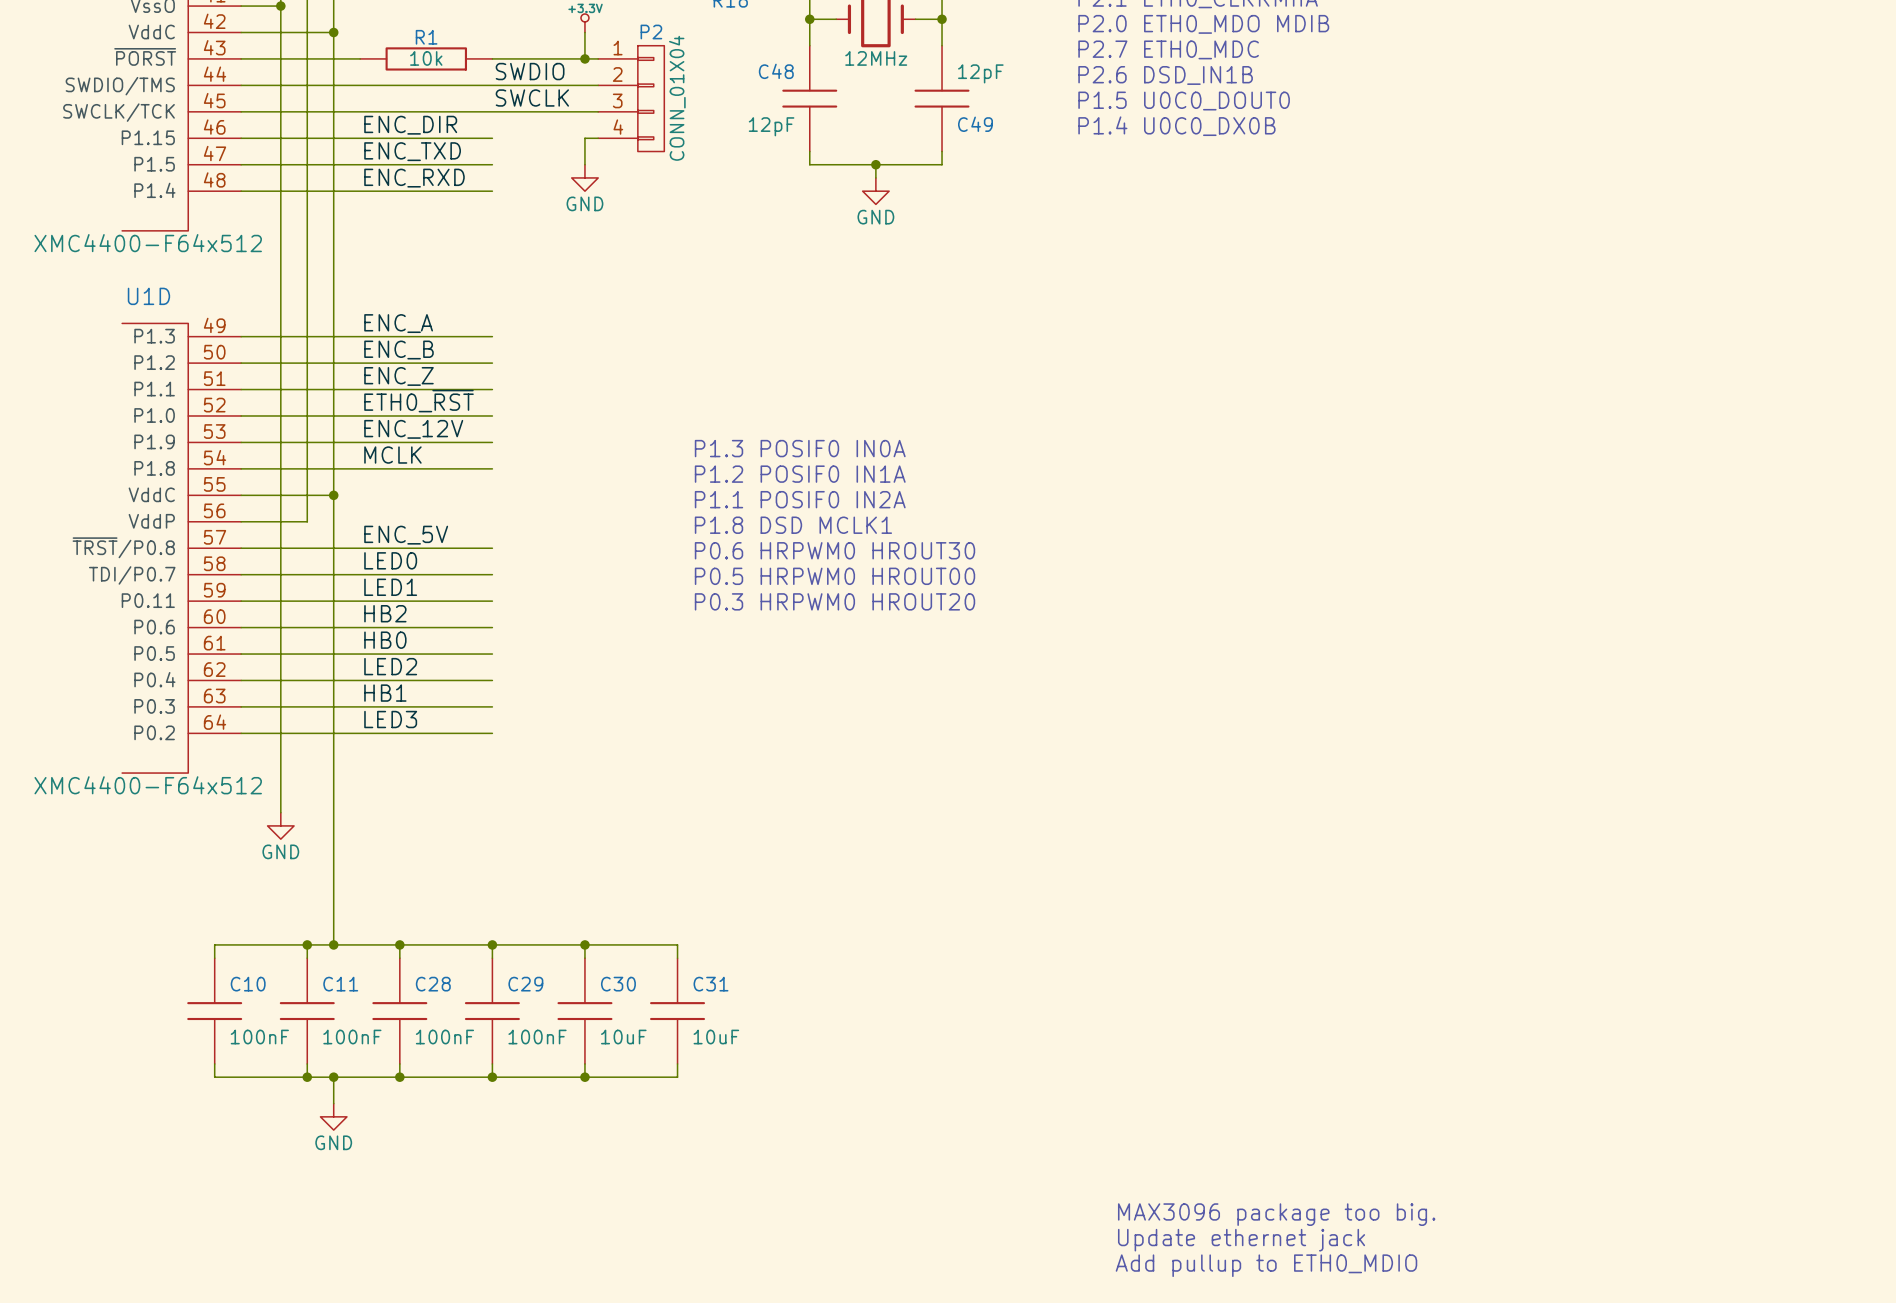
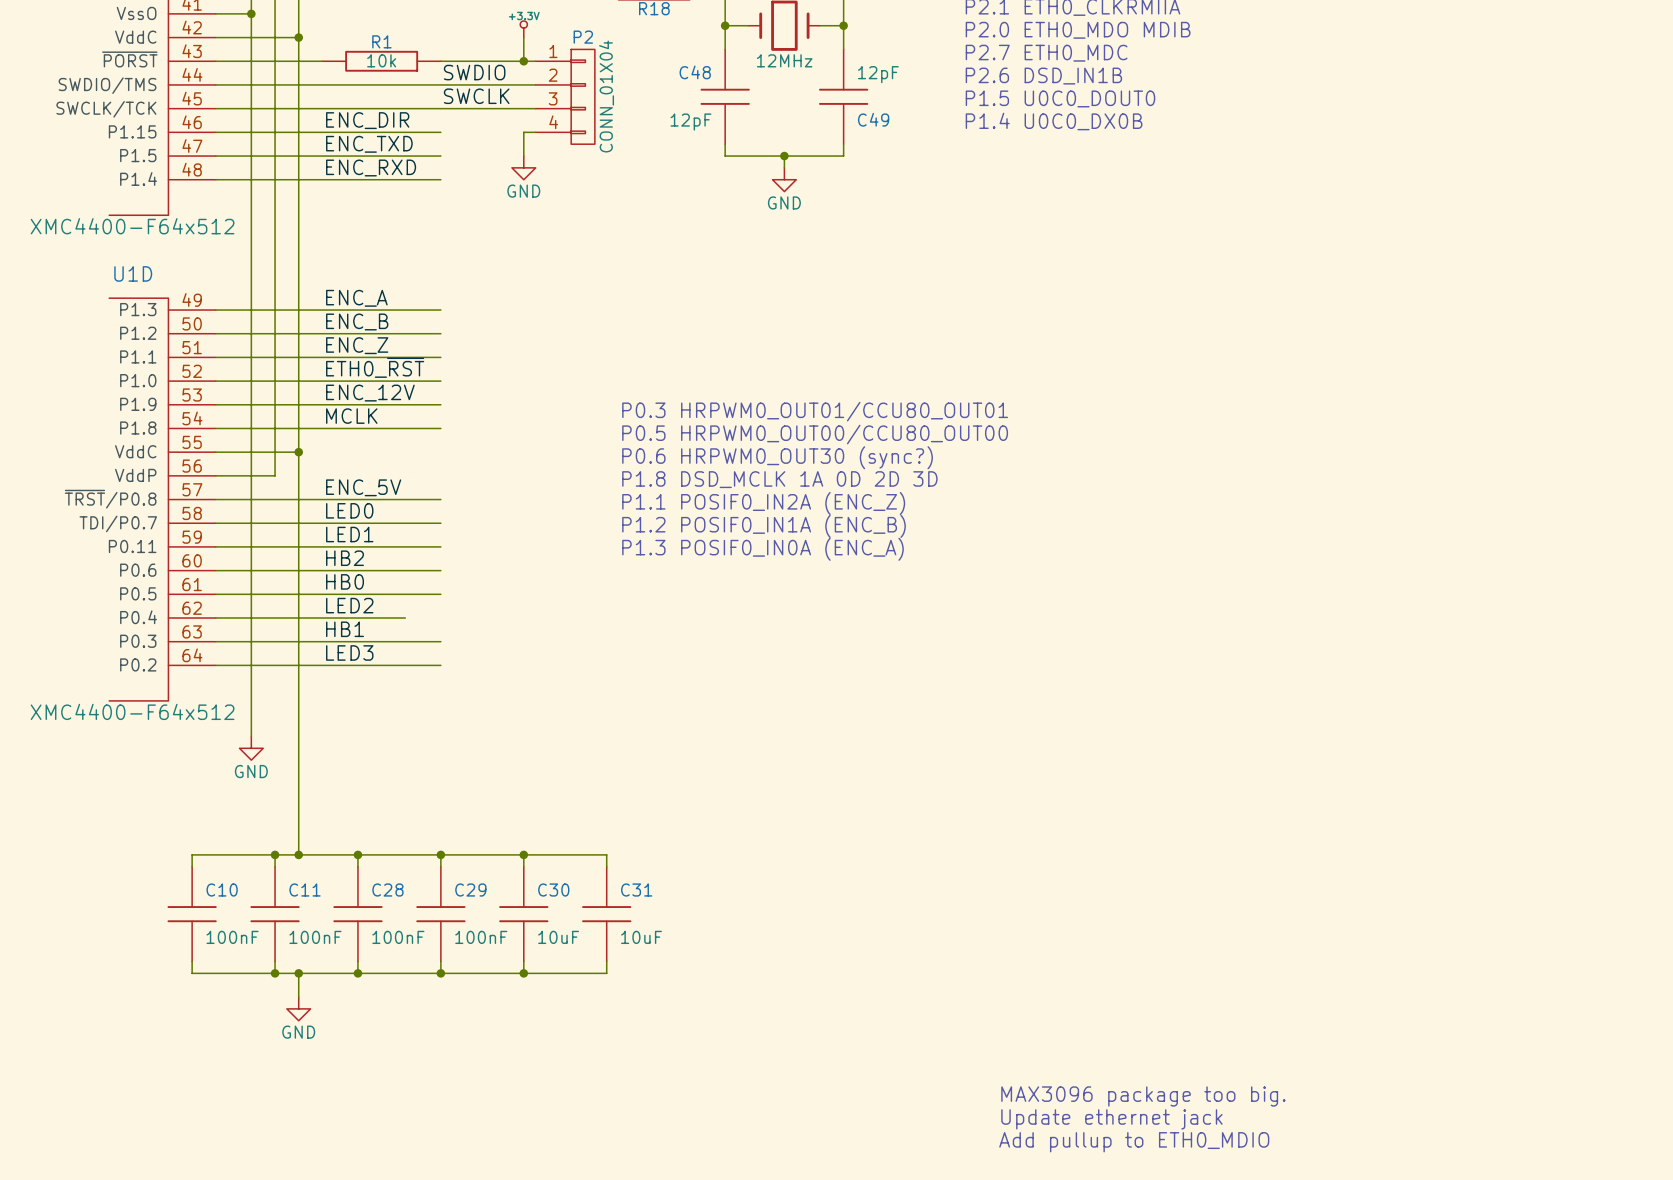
text: P1.3 POSIF0 IN0A (800, 448) -> P0.3 HRPWM0_OUT01/CCU80_OUT01 (815, 411)
text: P1.2 POSIF0 IN1A (800, 474) -> P0.5 HRPWM0_OUT00/CCU80_OUT00 (815, 434)
text: P1.1 POSIF0 IN2A (800, 499) -> P0.6 HRPWM0_OUT30 (sync?) (777, 457)
text: P1.8 DSD MCLK1 (793, 525) -> P1.8 DSD_MCLK 1A 0D 2D 3D (779, 479)
text: P0.6 HRPWM0 HROUT30 (834, 550) -> P1.1 POSIF0_IN2A (ENC_Z) (763, 503)
text: P0.5 HRPWM0 HROUT00 (834, 576) -> P1.2 POSIF0_IN1A (ENC_B) (764, 526)
text: P0.3 HRPWM0 HROUT20 (834, 601) -> P1.3 POSIF0_IN0A (ENC_A) (762, 549)
wire: (452, 680) (492, 680) -> none

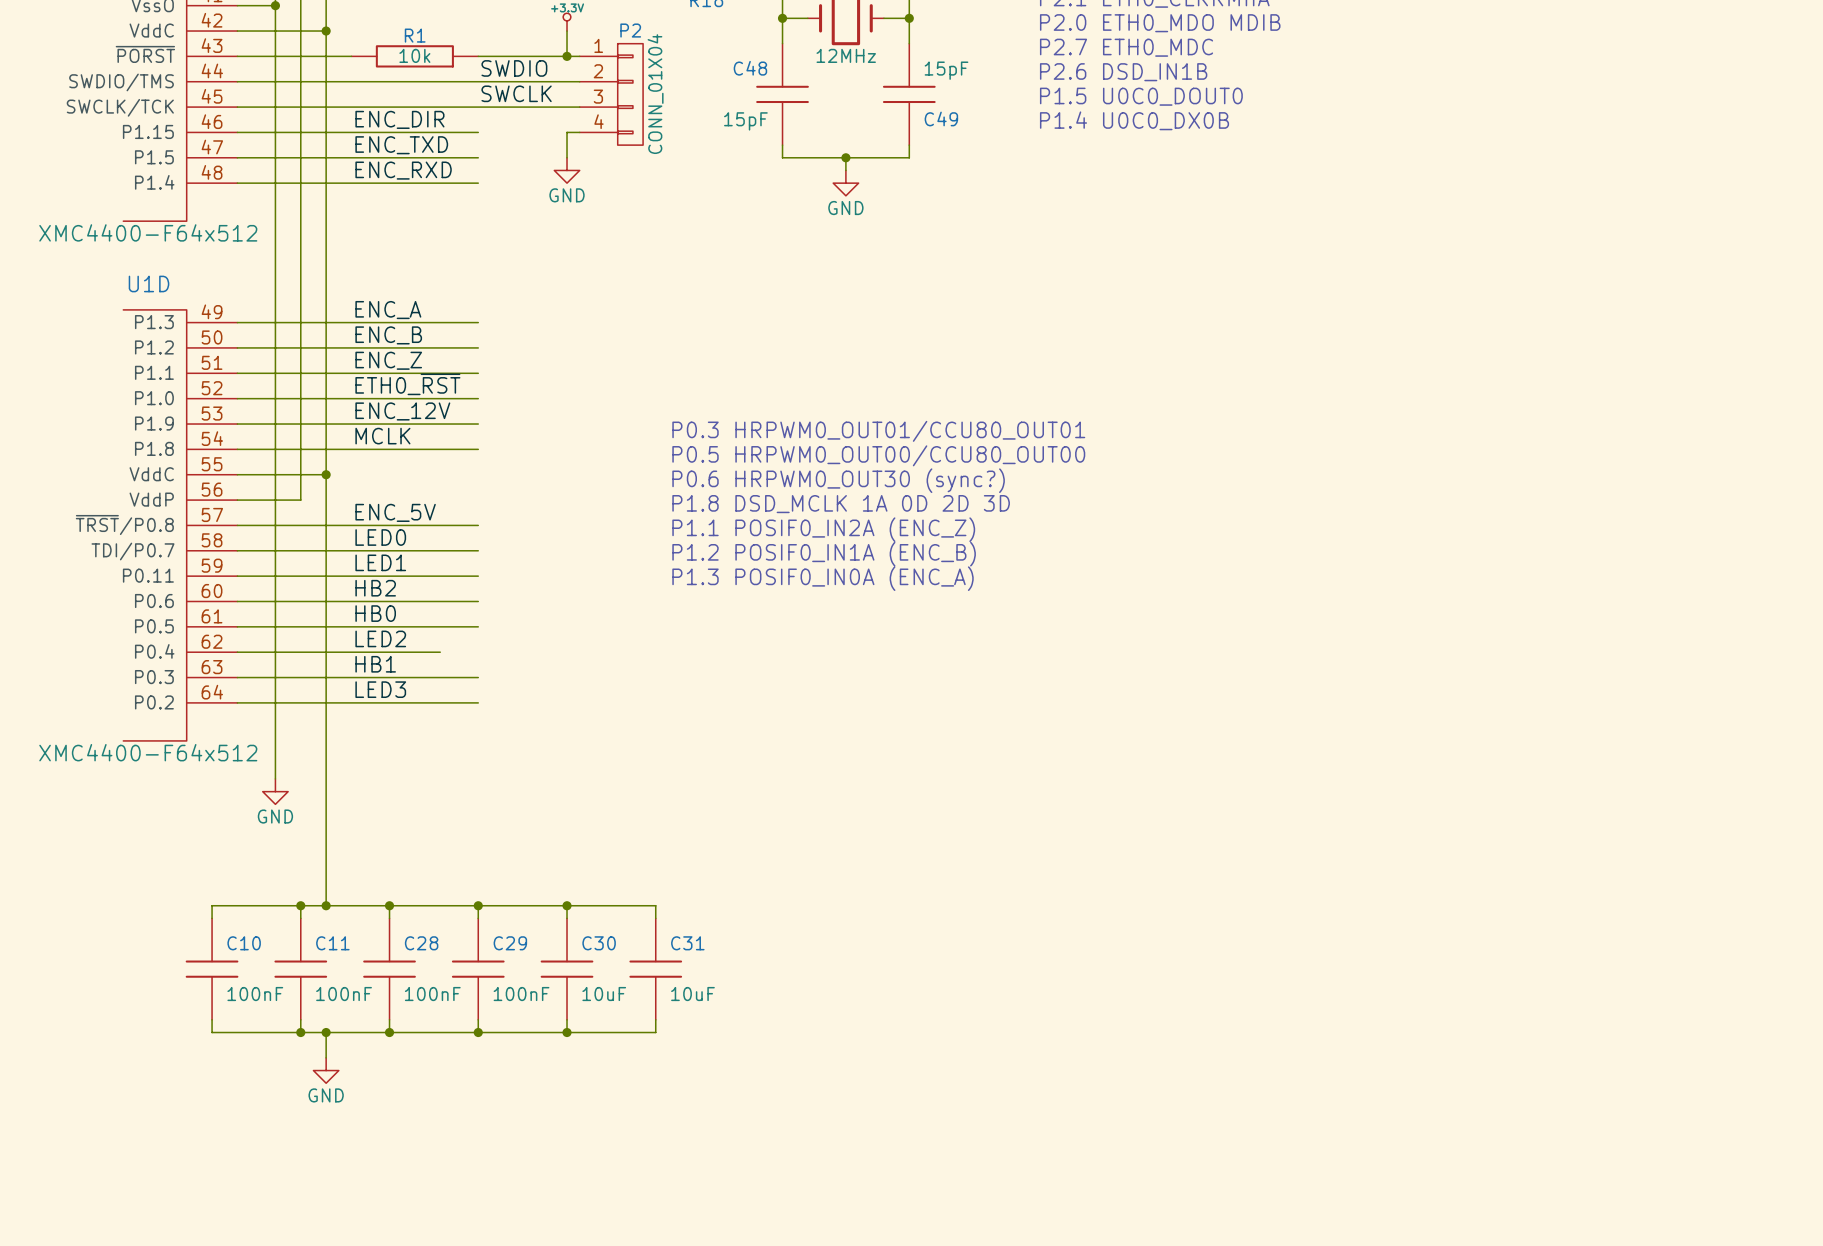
C49 value: 12pF (878, 74) -> 15pF (946, 70)
C48 value: 12pF (690, 122) -> 15pF (745, 121)
text: MAX3096 package too big. (1143, 1096) -> none
text: Update ethernet jack (1111, 1119) -> none
text: Add pullup to ETH0_MDIO (1134, 1142) -> none

